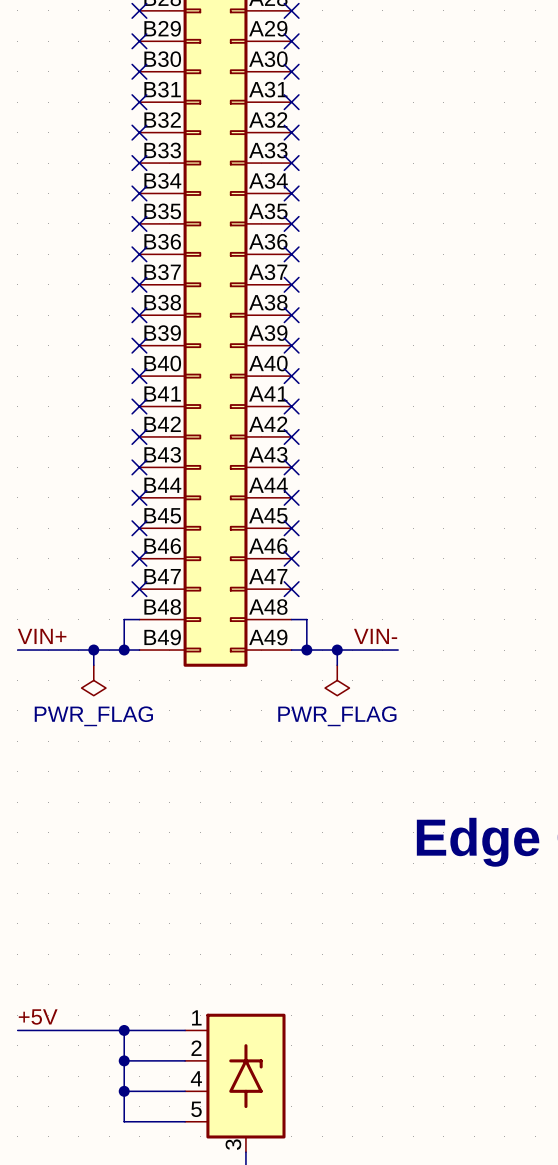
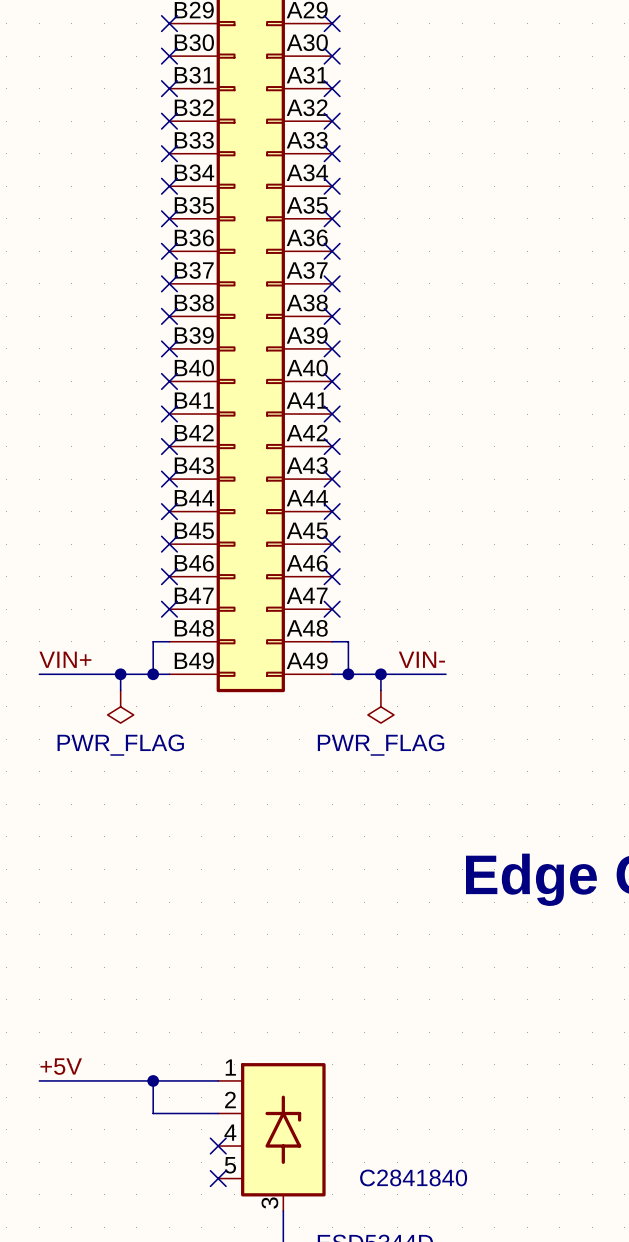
wire: (124, 1060) (124, 1121) (185, 1121) -> none
junction: (124, 1060) -> none
wire: (124, 1091) (185, 1091) -> none
junction: (124, 1091) -> none
no-connect mark: none -> (218, 1146)
no-connect mark: none -> (218, 1178)
part text: none -> C2841840 (413, 1177)

